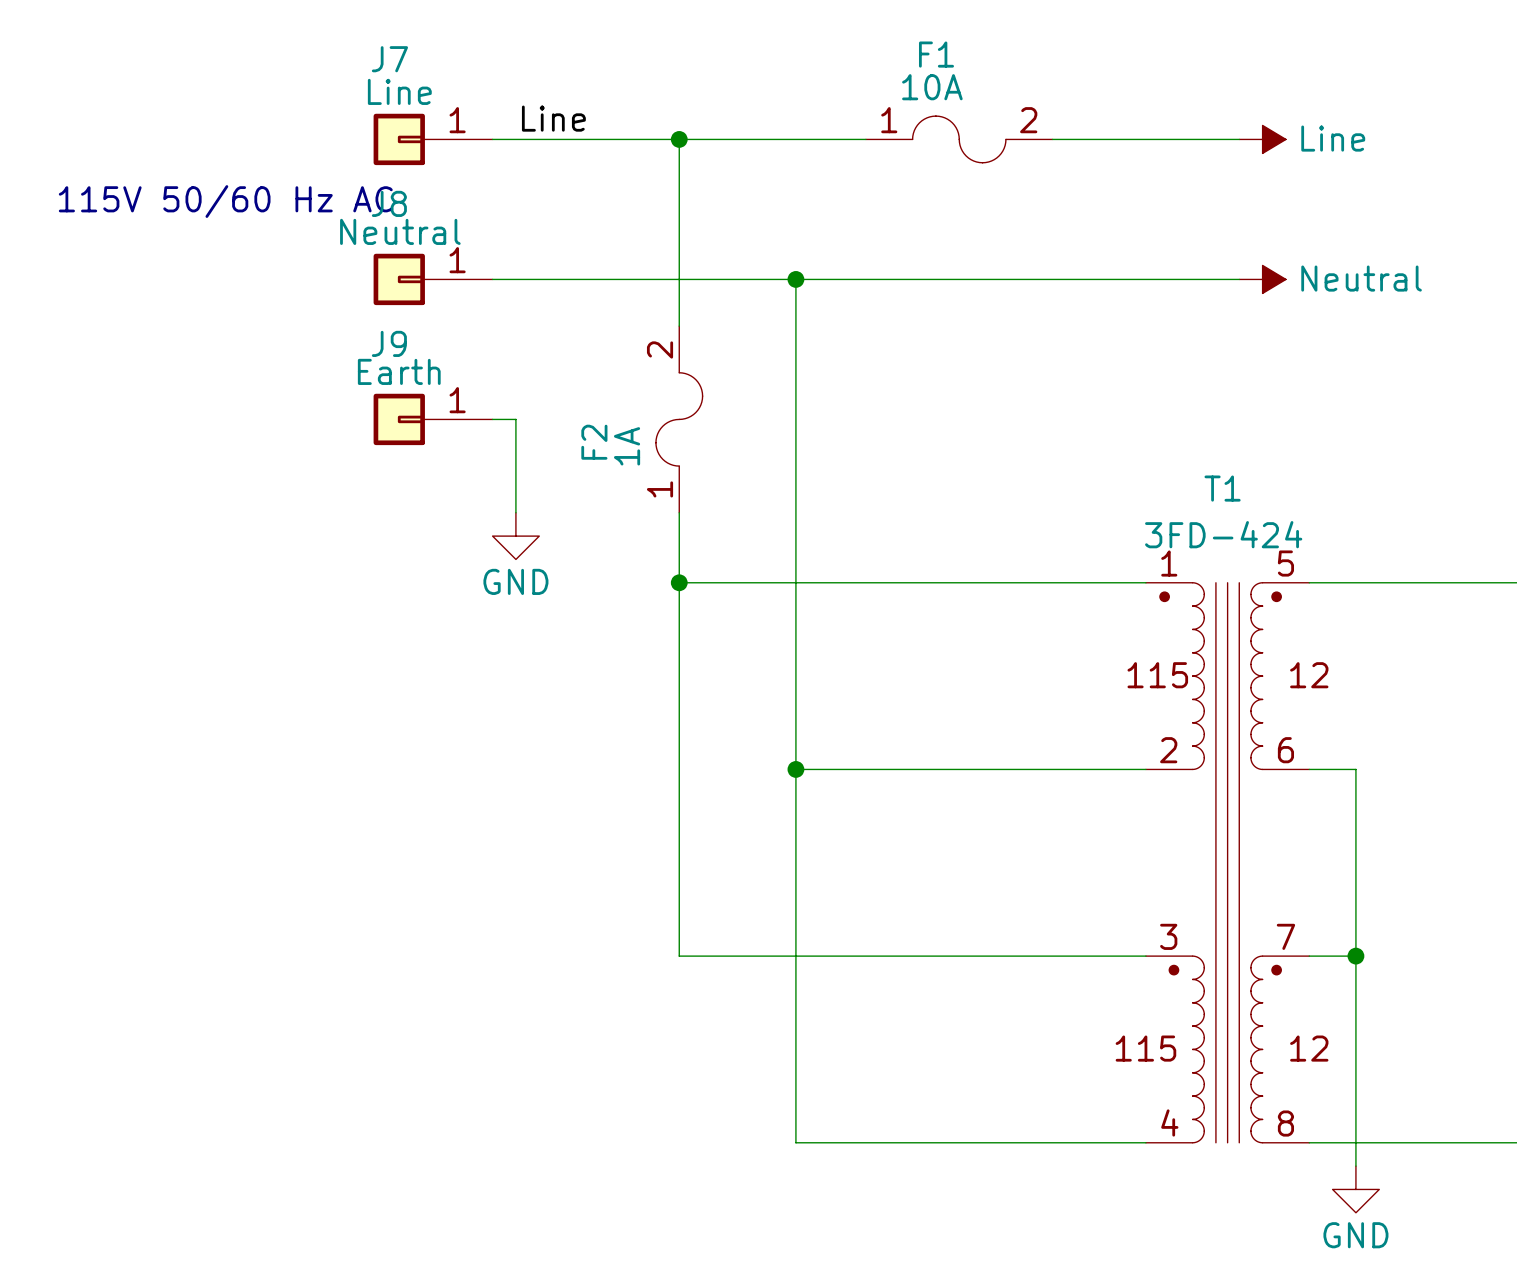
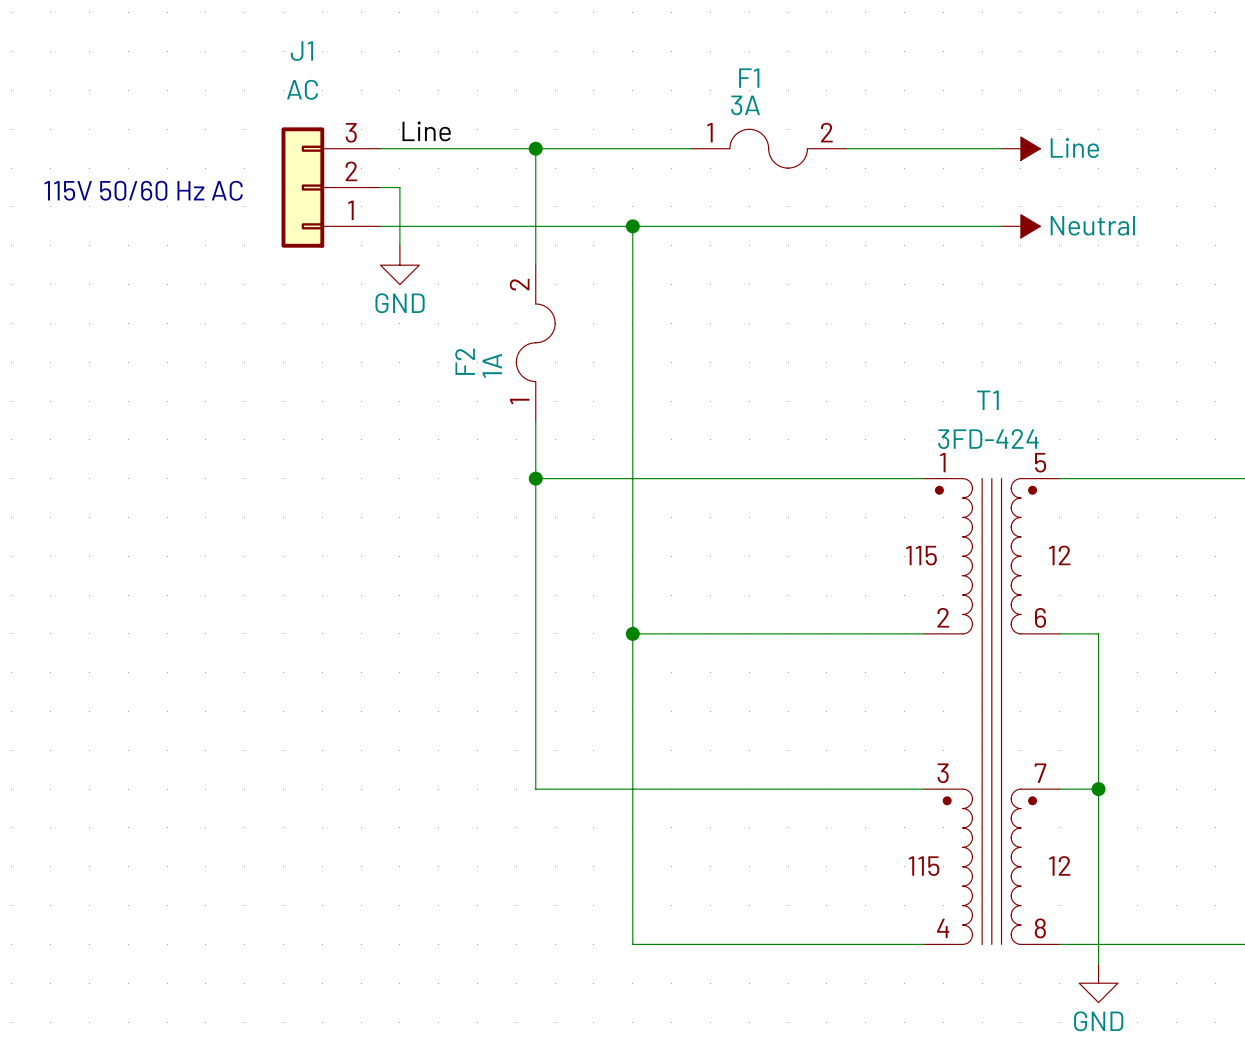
F1 value: 10A (932, 87) -> 3A (745, 105)
label position: Line (553, 118) -> Line (426, 131)
J7: Line (433, 139) -> none
wire: (492, 139) (865, 139) -> (380, 148) (691, 148)
wire: (679, 139) (679, 186) -> none
junction position: (679, 139) -> (535, 148)
F1 position: (959, 139) -> (768, 148)
wire: (1052, 139) (1239, 139) -> (846, 148) (1001, 148)
power symbol position: Line (1262, 139) -> Line (1020, 148)
text position: 115V 50/60 Hz AC (225, 201) -> 115V 50/60 Hz AC (143, 190)
J1: none -> AC (331, 187)
wire: none -> (380, 187) (399, 187) (399, 245)
J8: Neutral (433, 279) -> none
J9: Earth (433, 419) -> none
wire: (492, 419) (515, 419) (515, 512) -> none
power symbol position: GND (515, 536) -> GND (399, 265)

